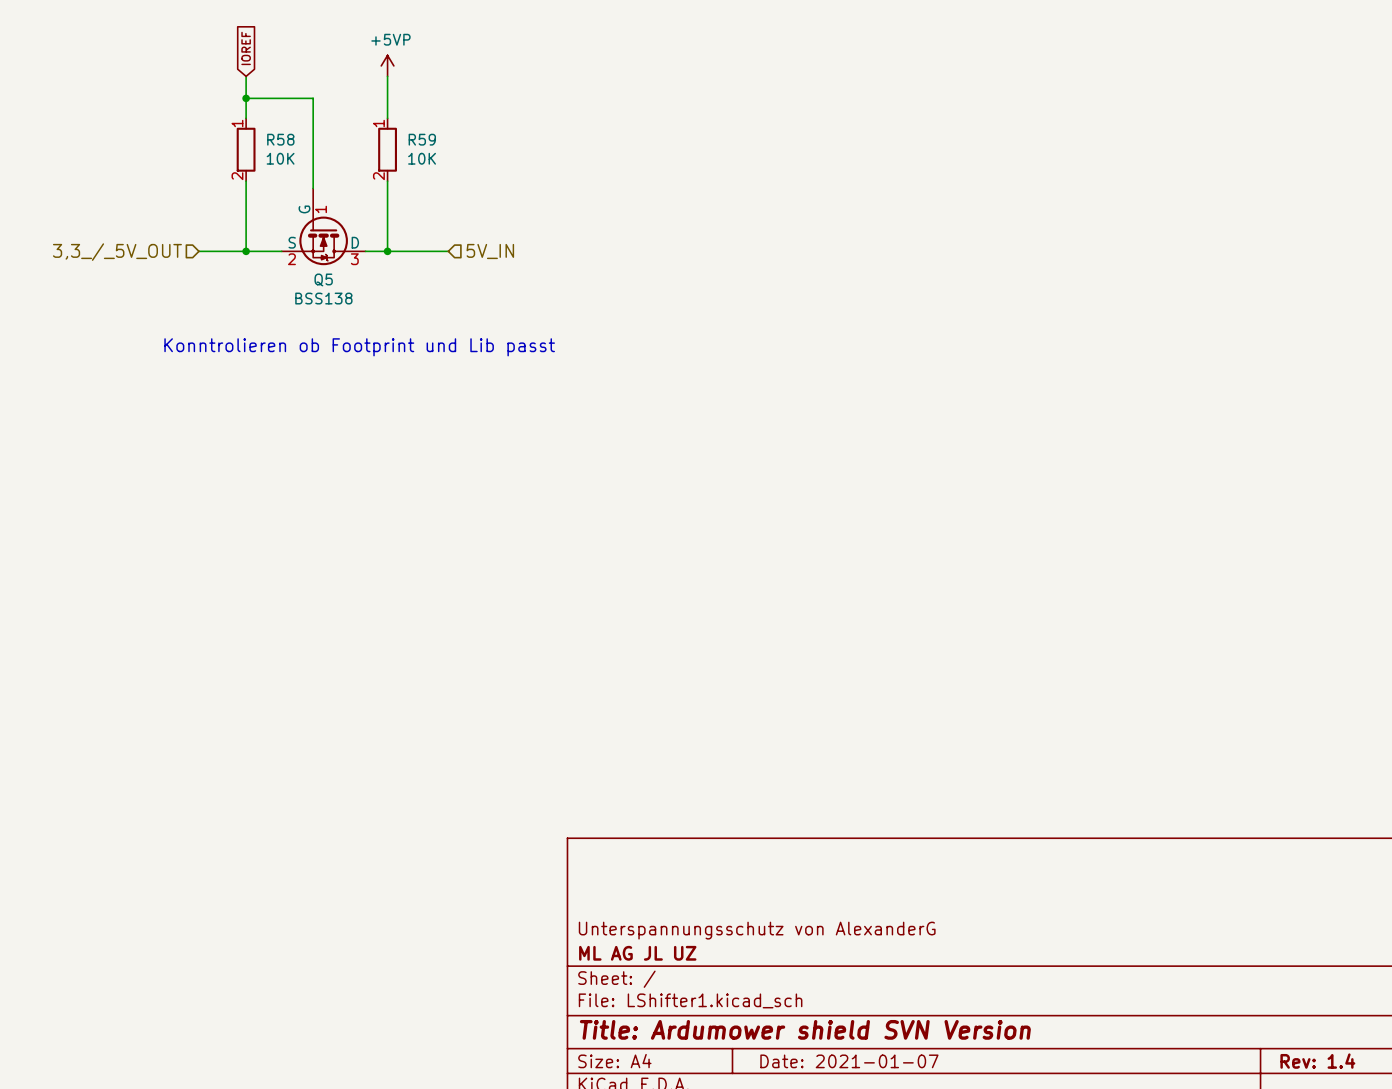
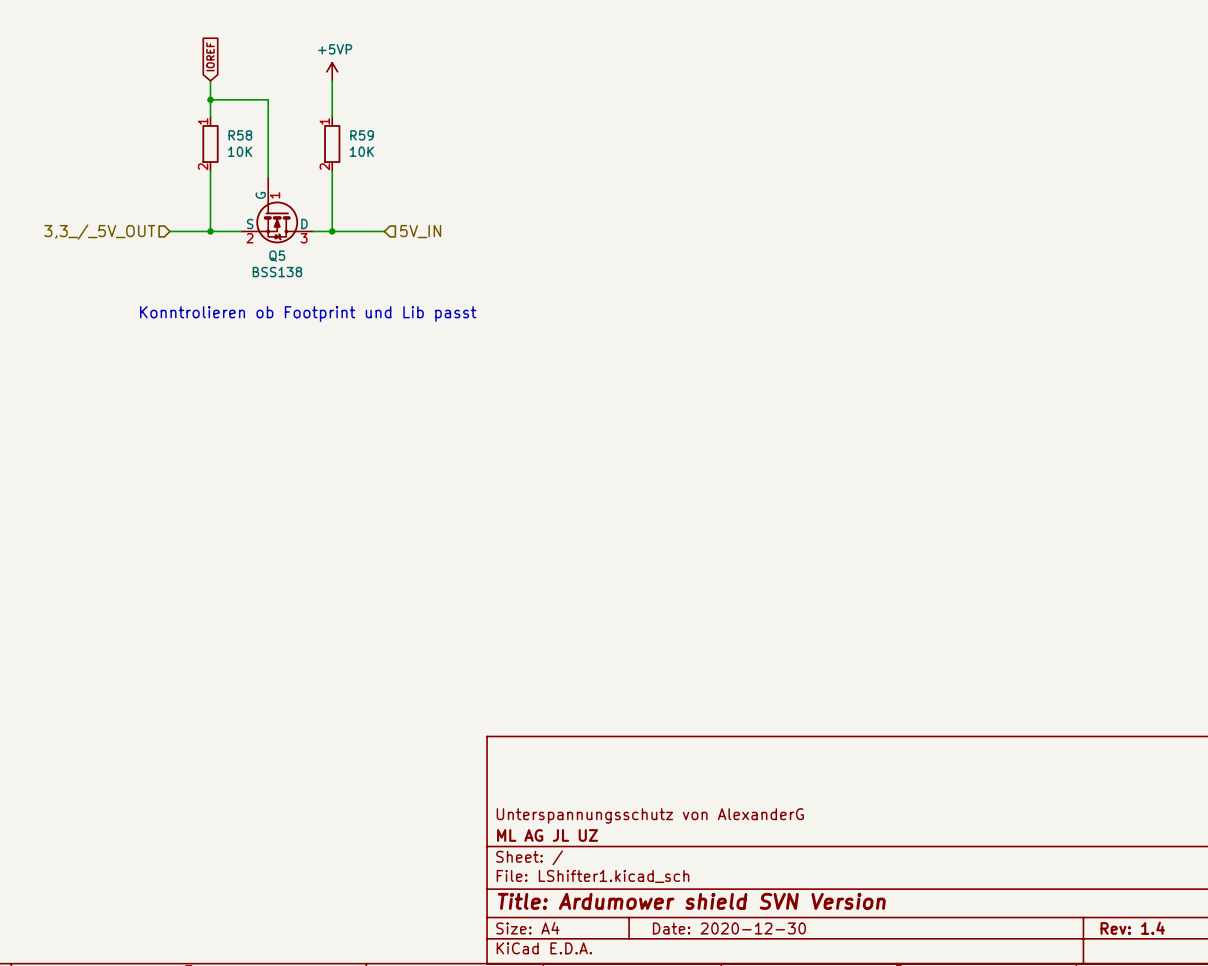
title block: Date: 2021-01-07 (849, 1061) -> Date: 2020-12-30 (729, 928)

